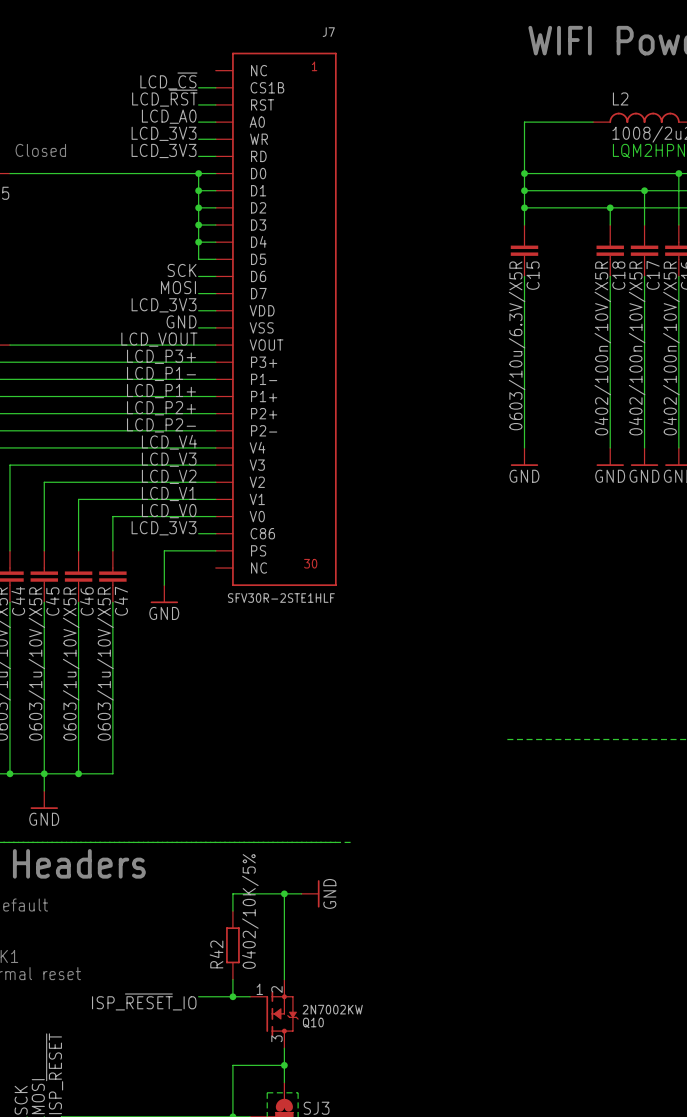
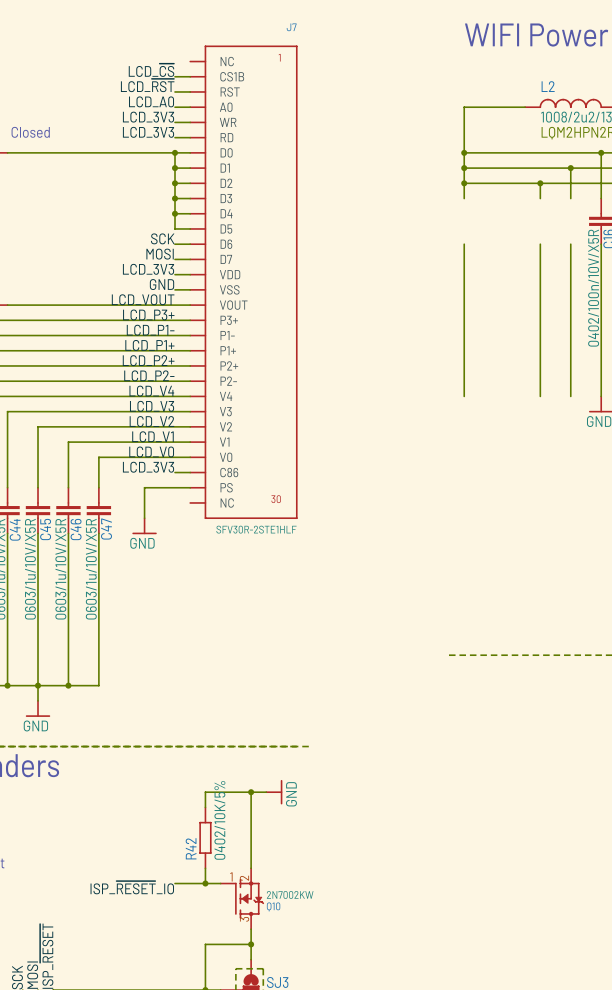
C15: 0603/10u/6.3V/X5R (524, 250) -> none
C18: 0402/100n/10V/X5R (610, 250) -> none
C17: 0402/100n/10V/X5R (644, 250) -> none
power symbol: GND (524, 456) -> none
power symbol: GND (610, 456) -> none
power symbol: GND (644, 456) -> none

